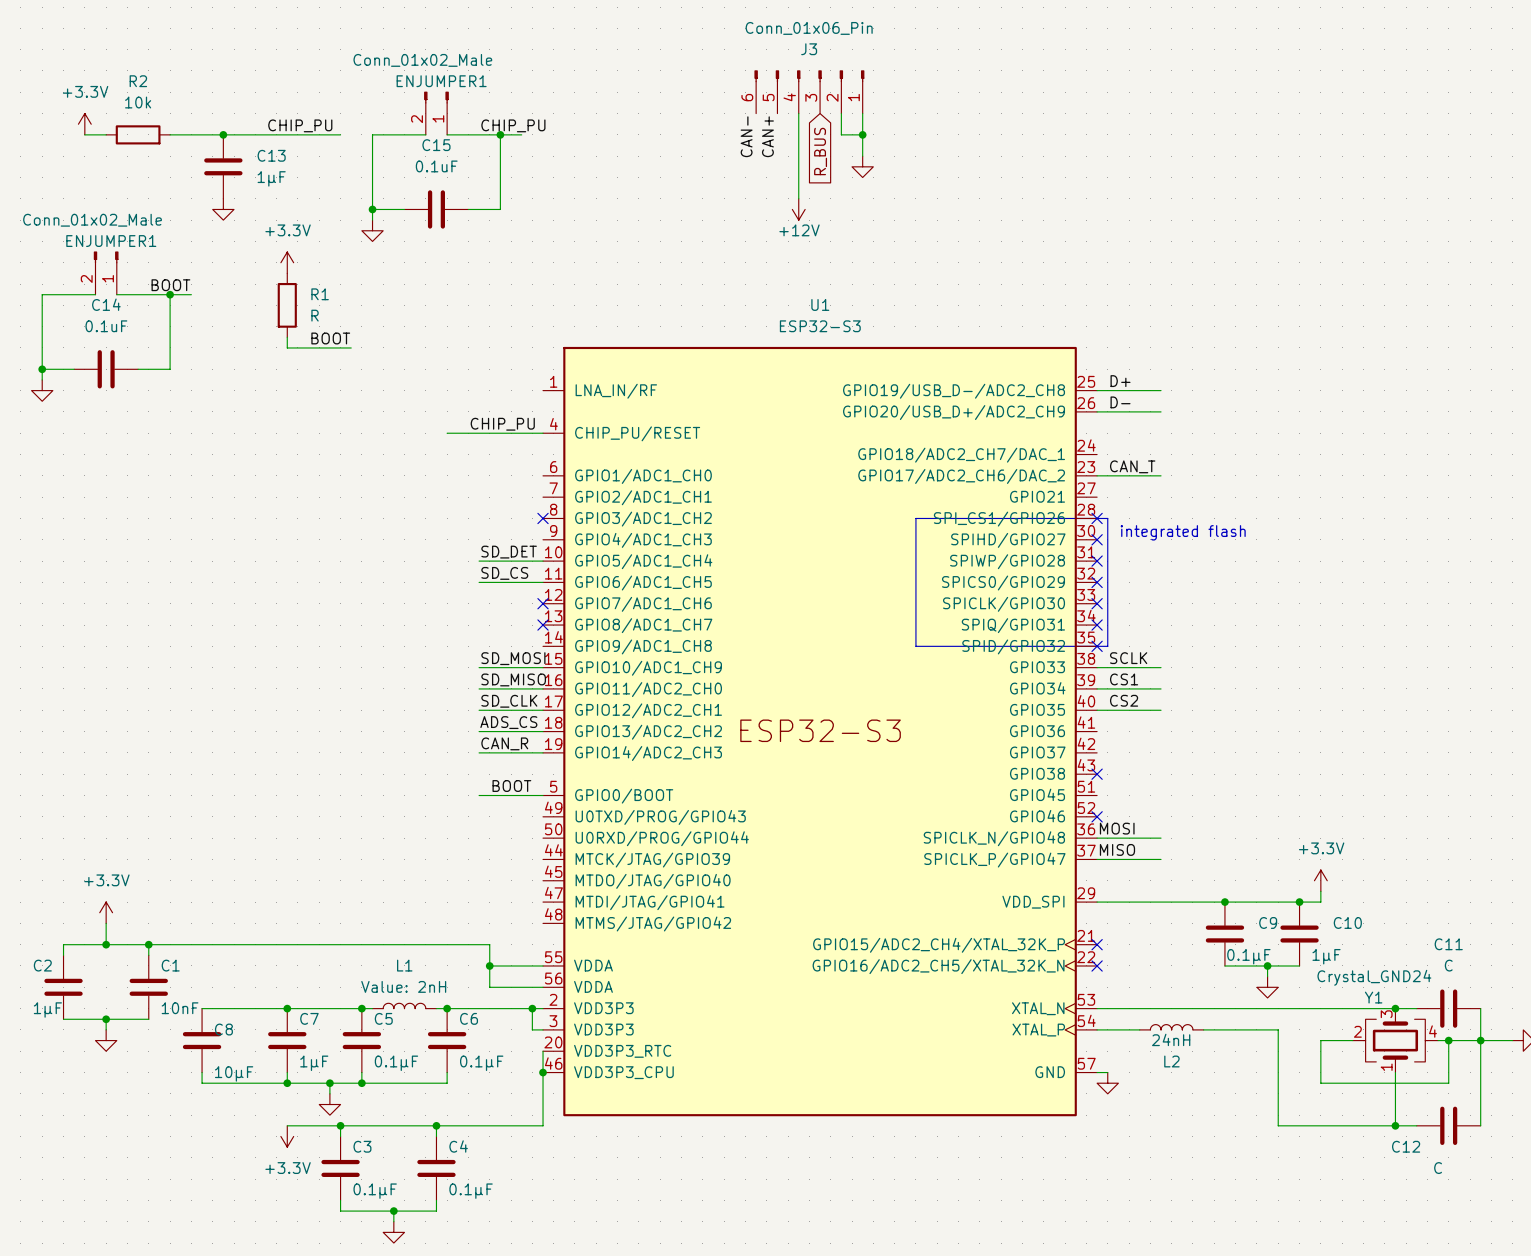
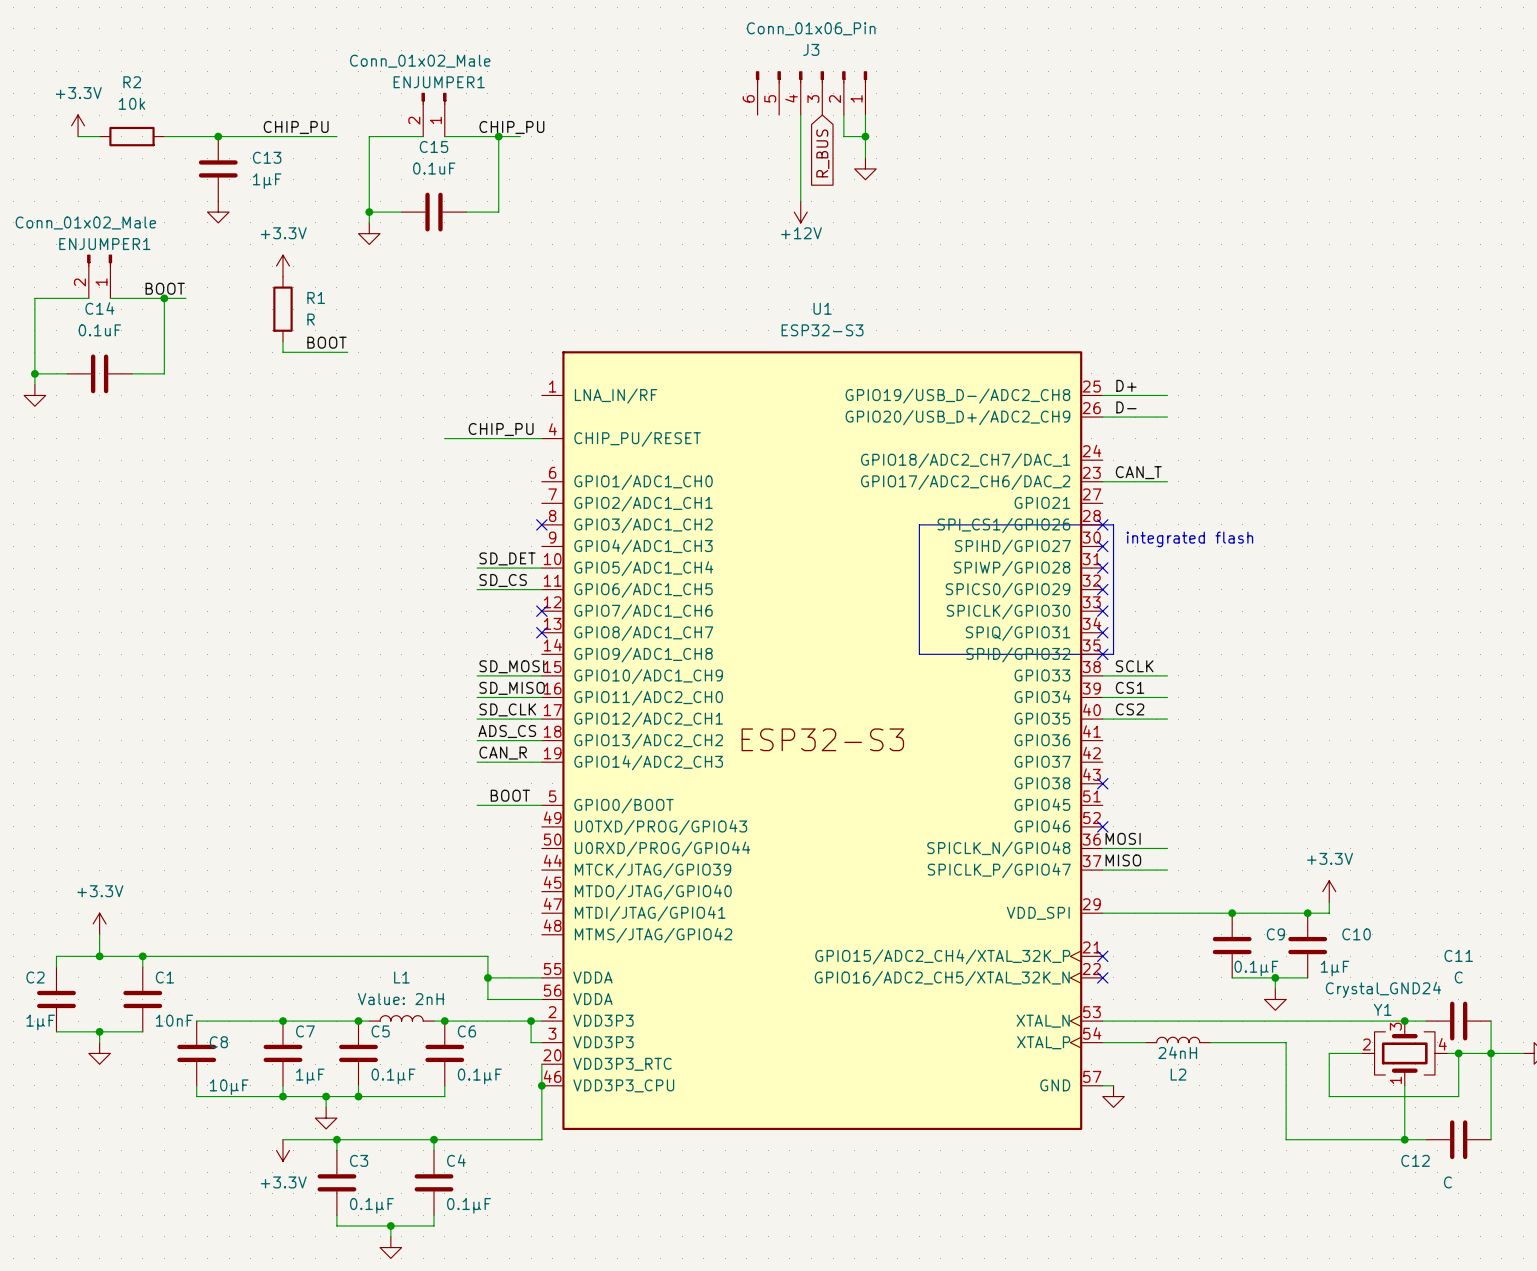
label: CAN- (746, 136) -> none
label: CAN+ (767, 136) -> none

